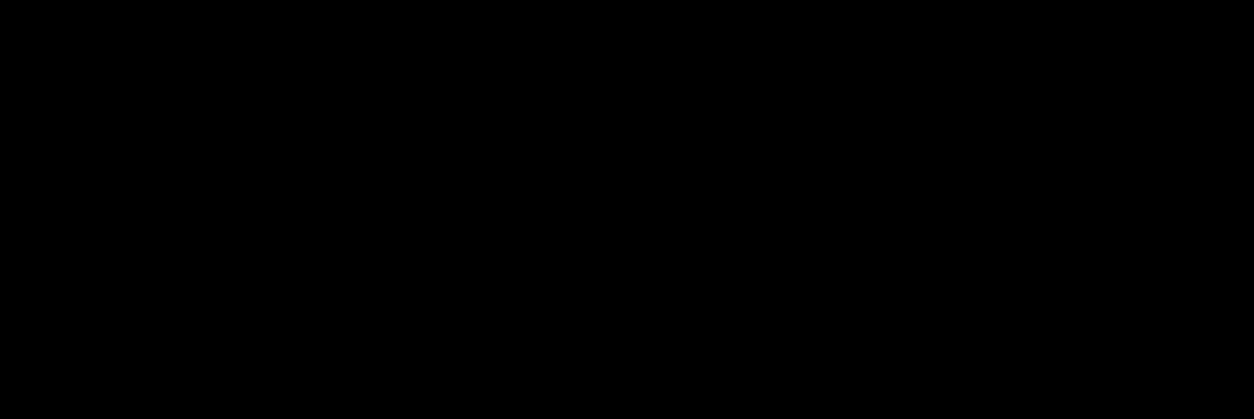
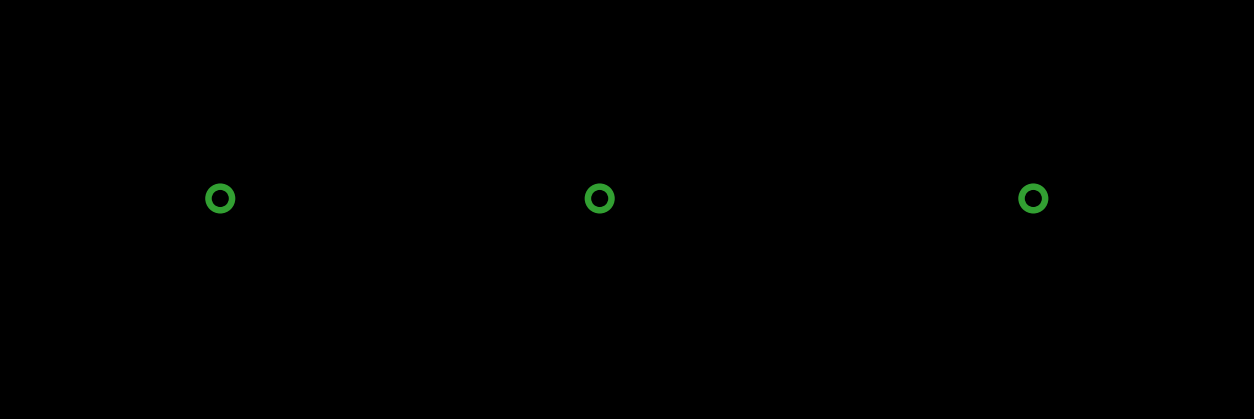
part: none -> (220, 198)
part: none -> (599, 198)
part: none -> (1033, 198)

